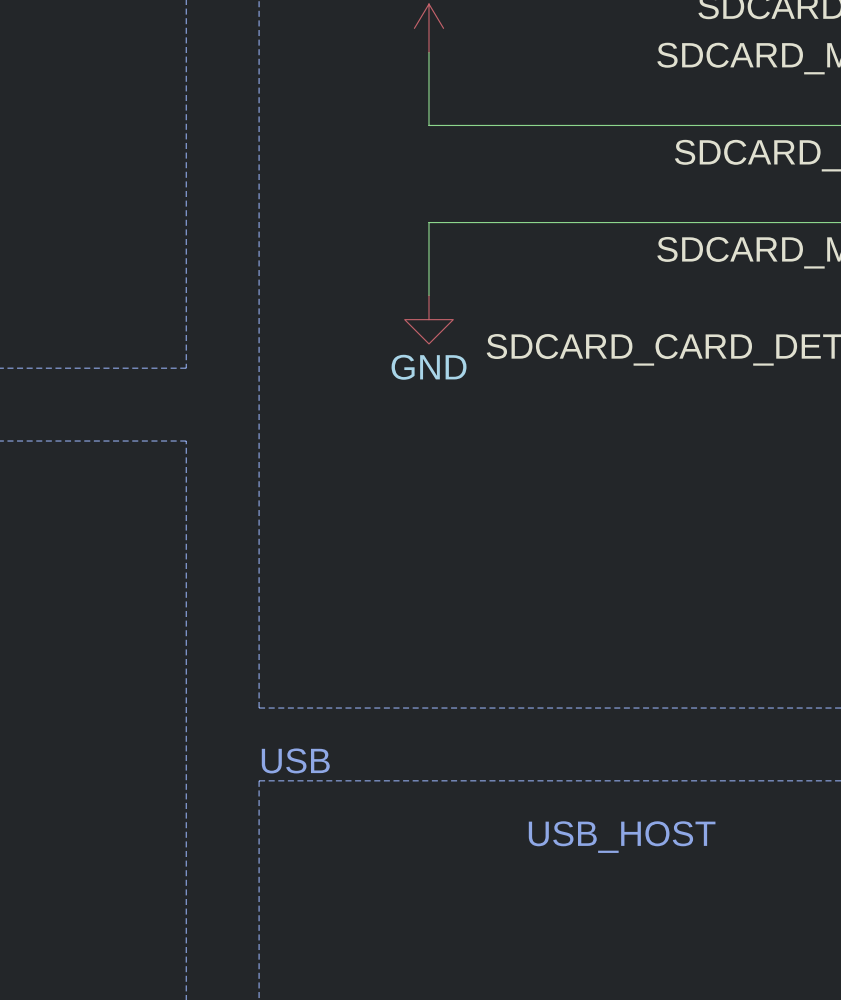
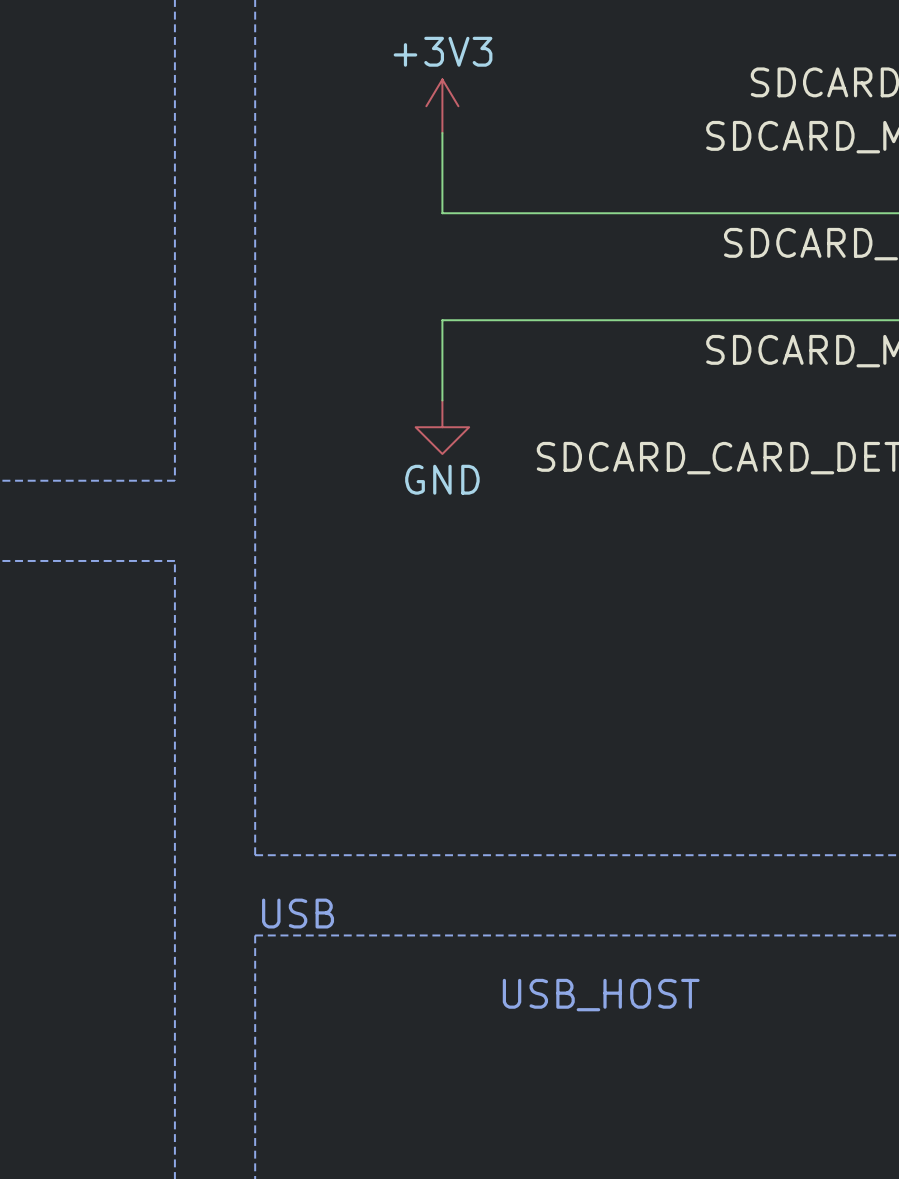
text position: USB_HOST (622, 837) -> USB_HOST (601, 995)

